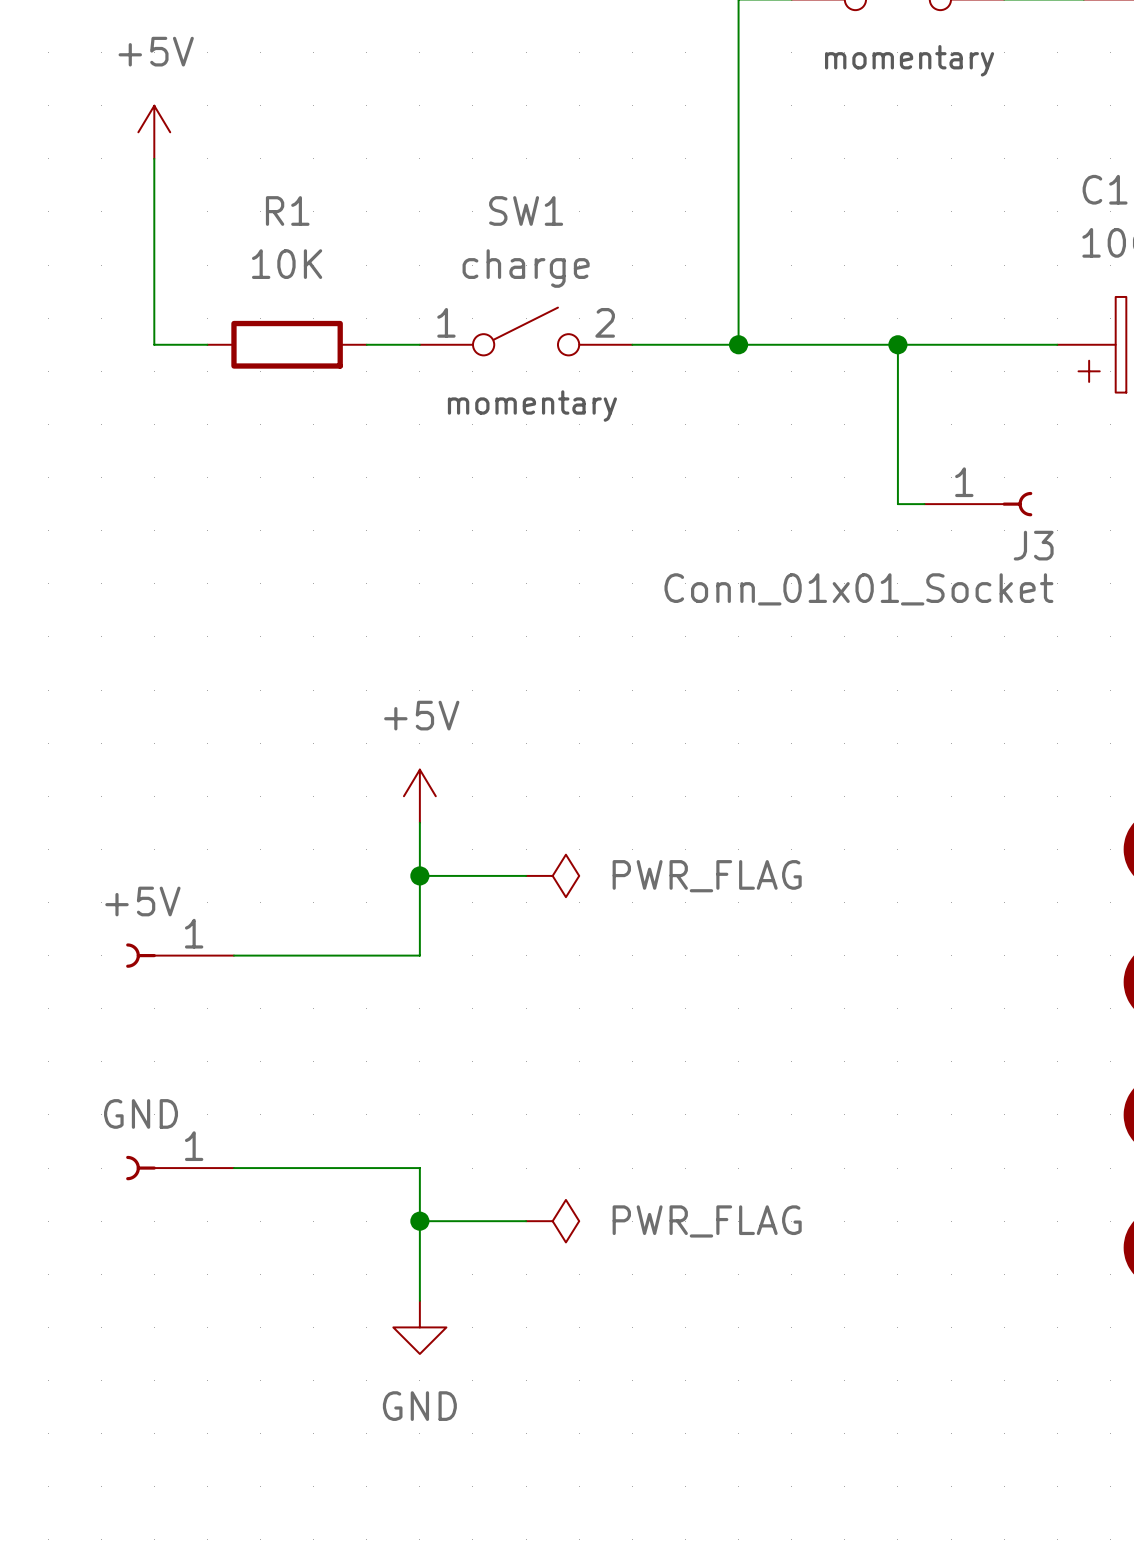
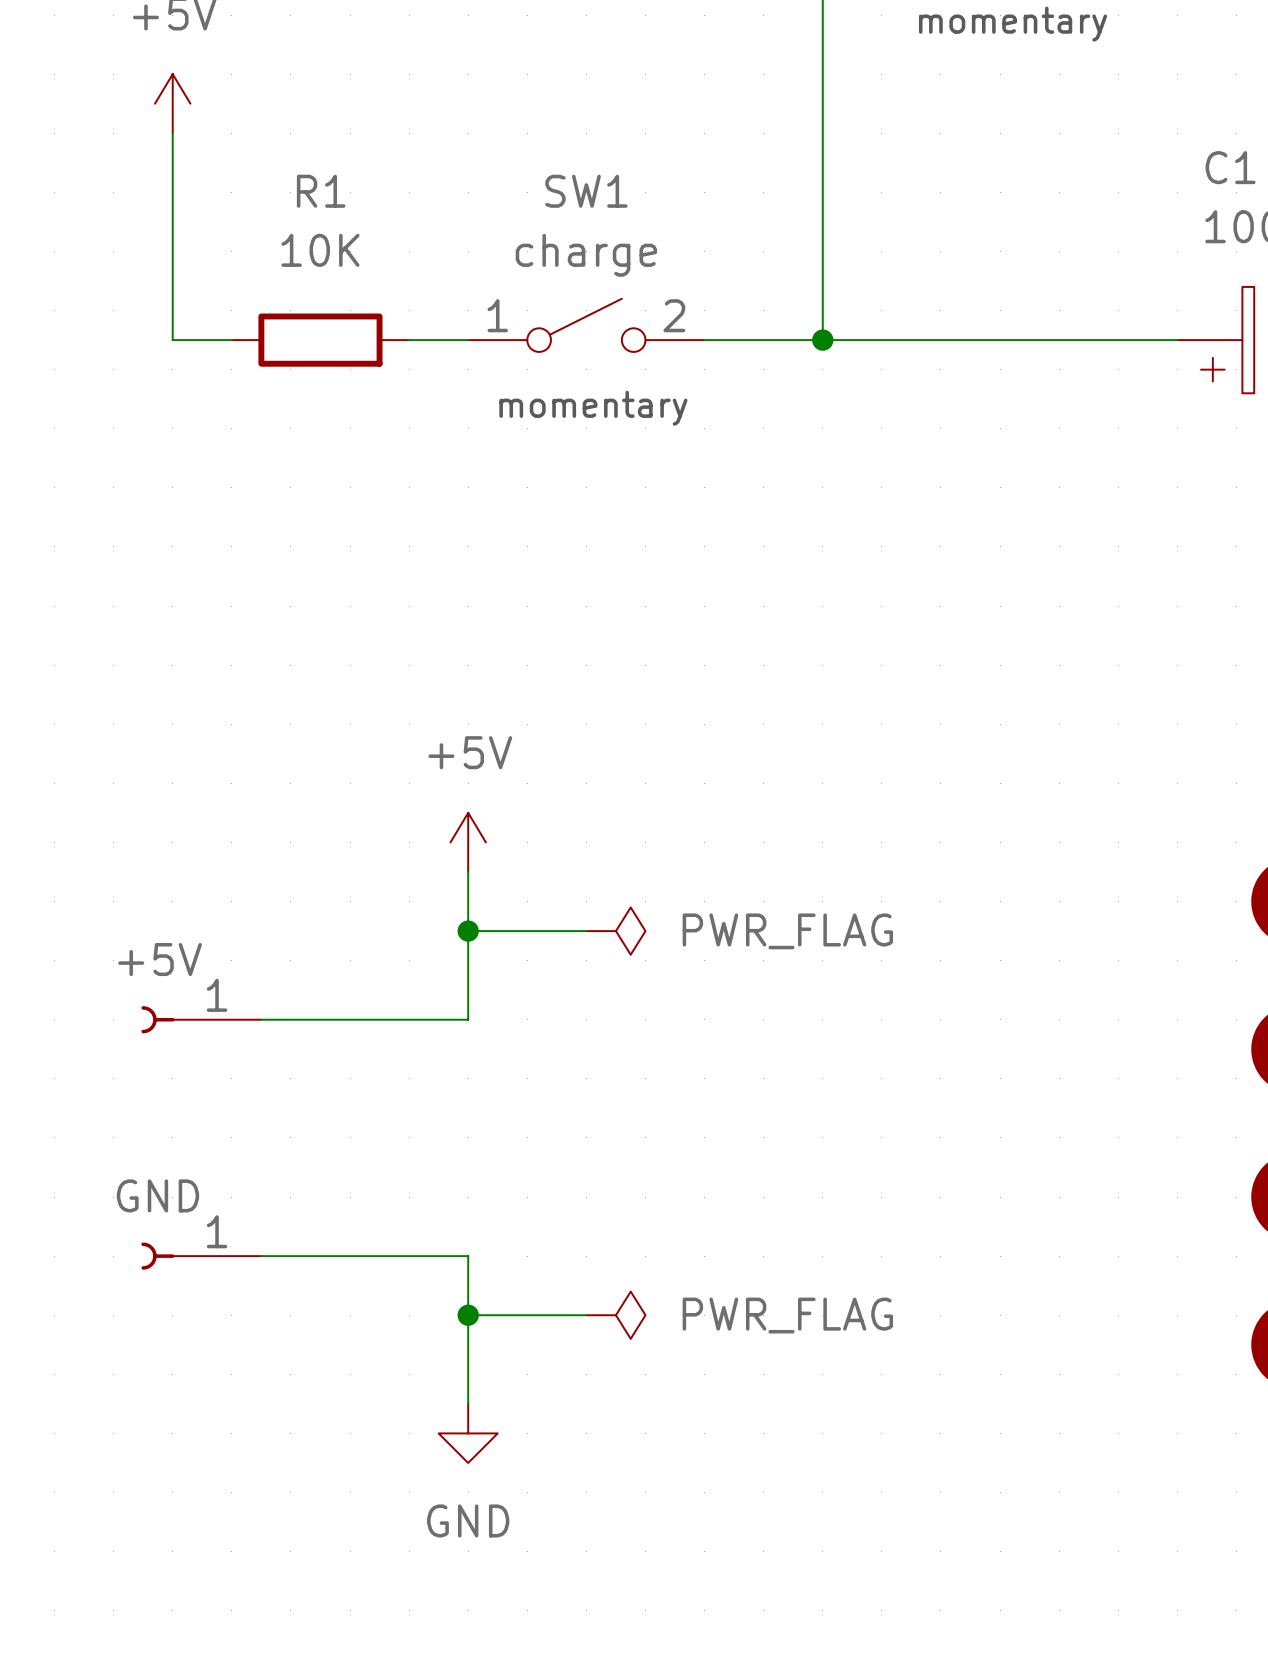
wire: (897, 344) (897, 504) (924, 504) -> none
junction: (897, 344) -> none
J3: Conn_01x01_Socket (978, 504) -> none

